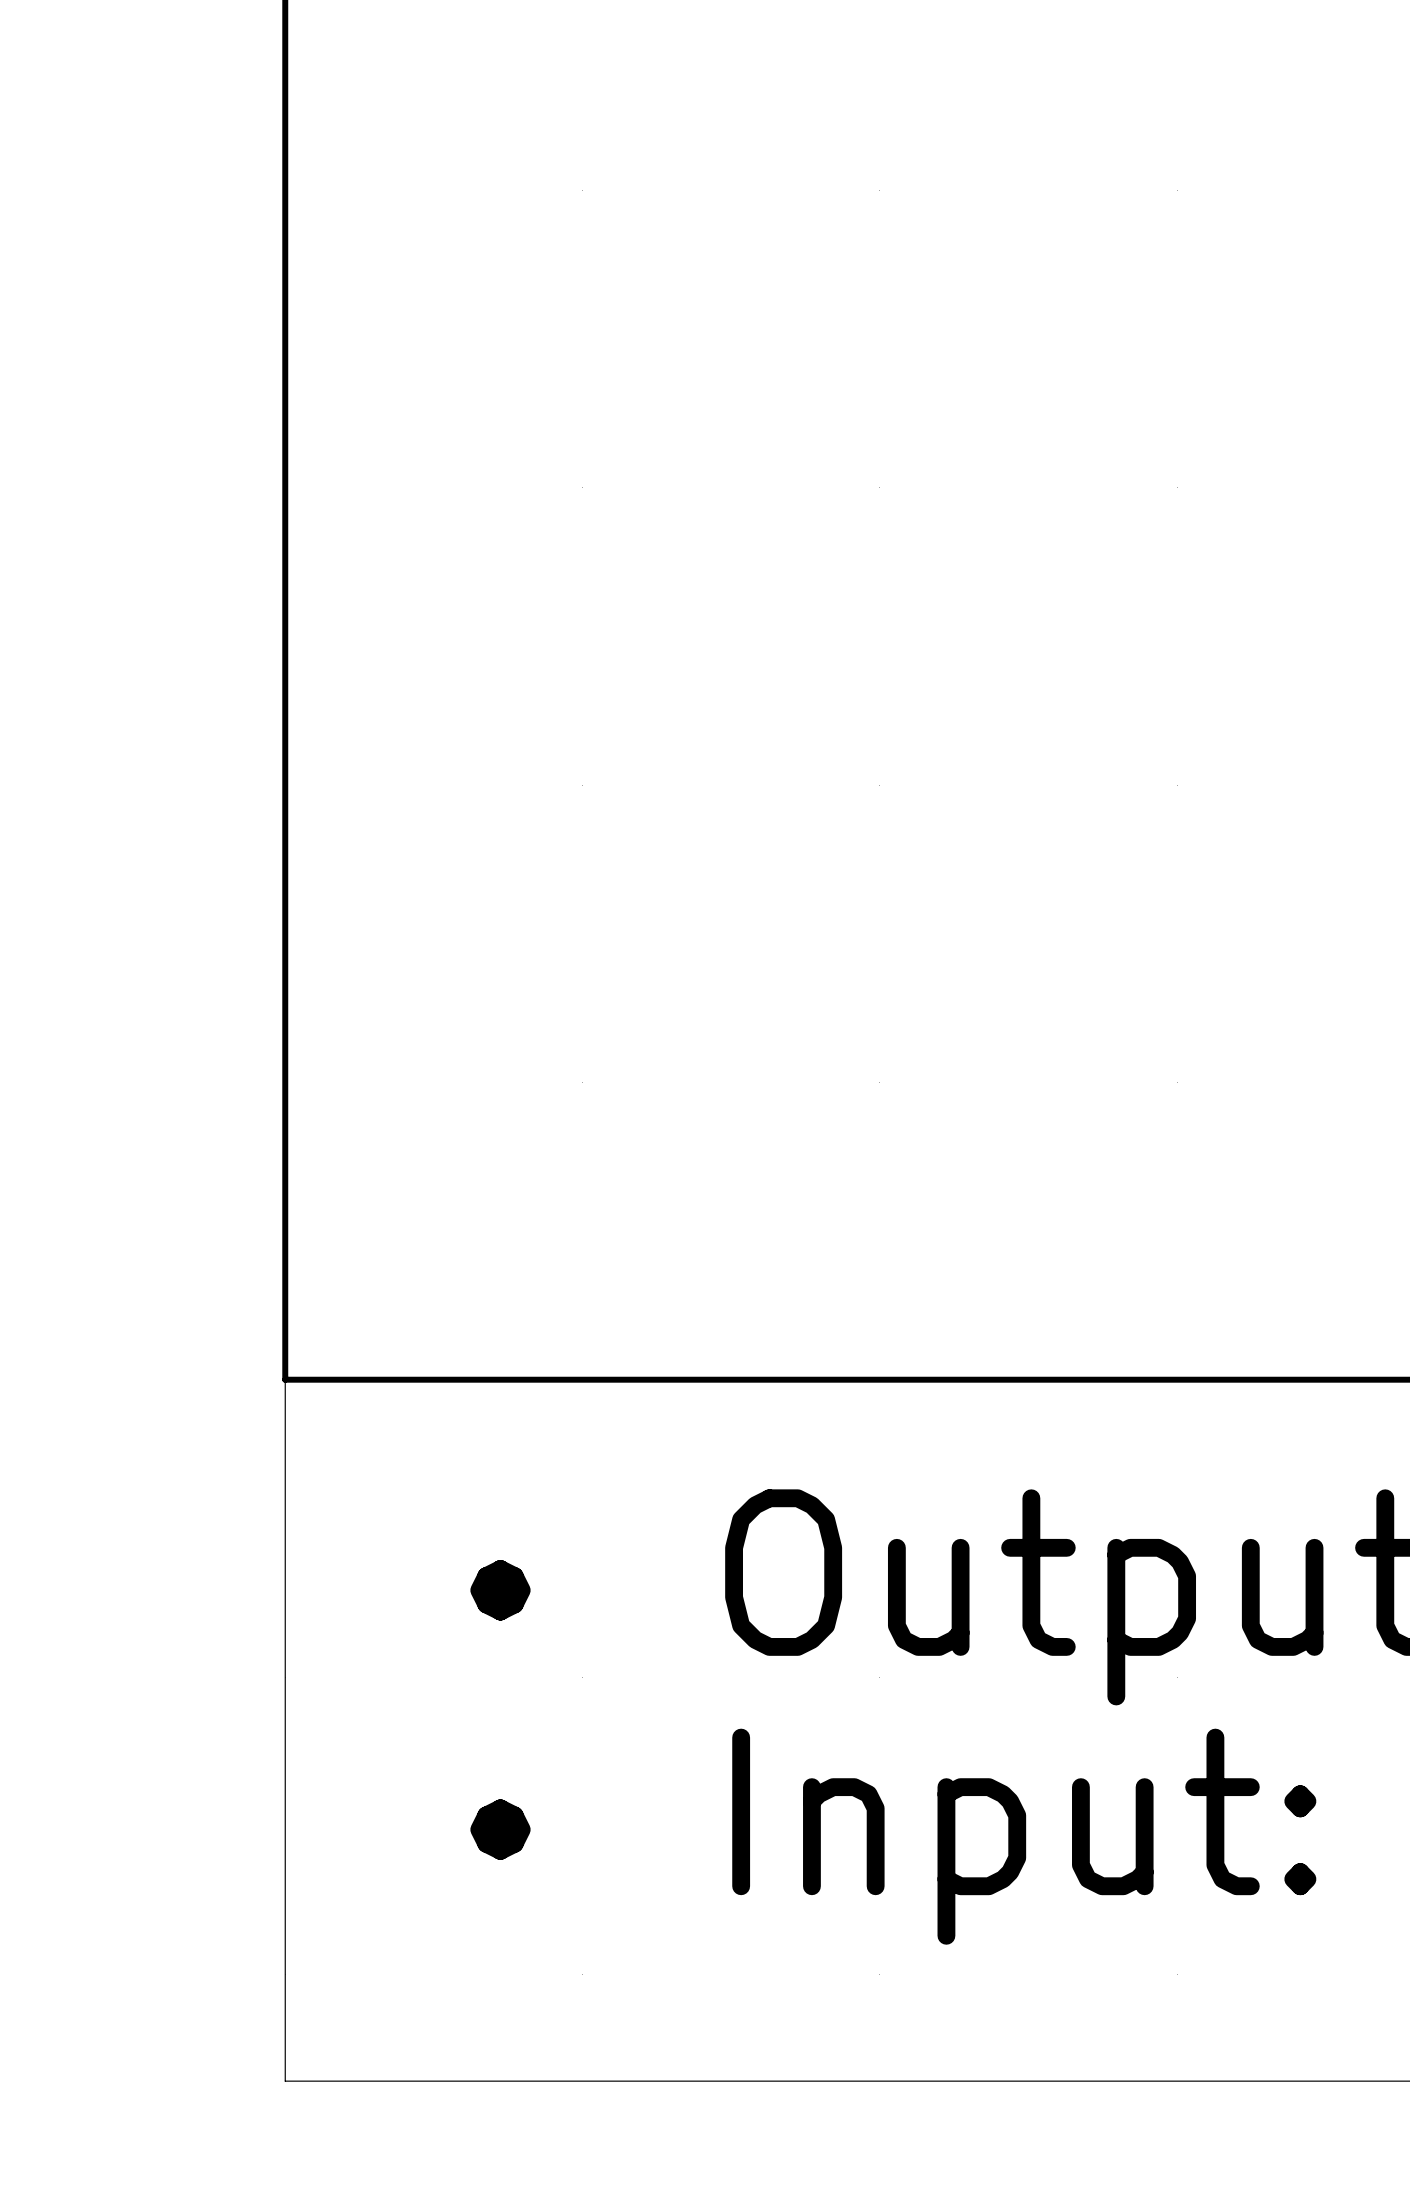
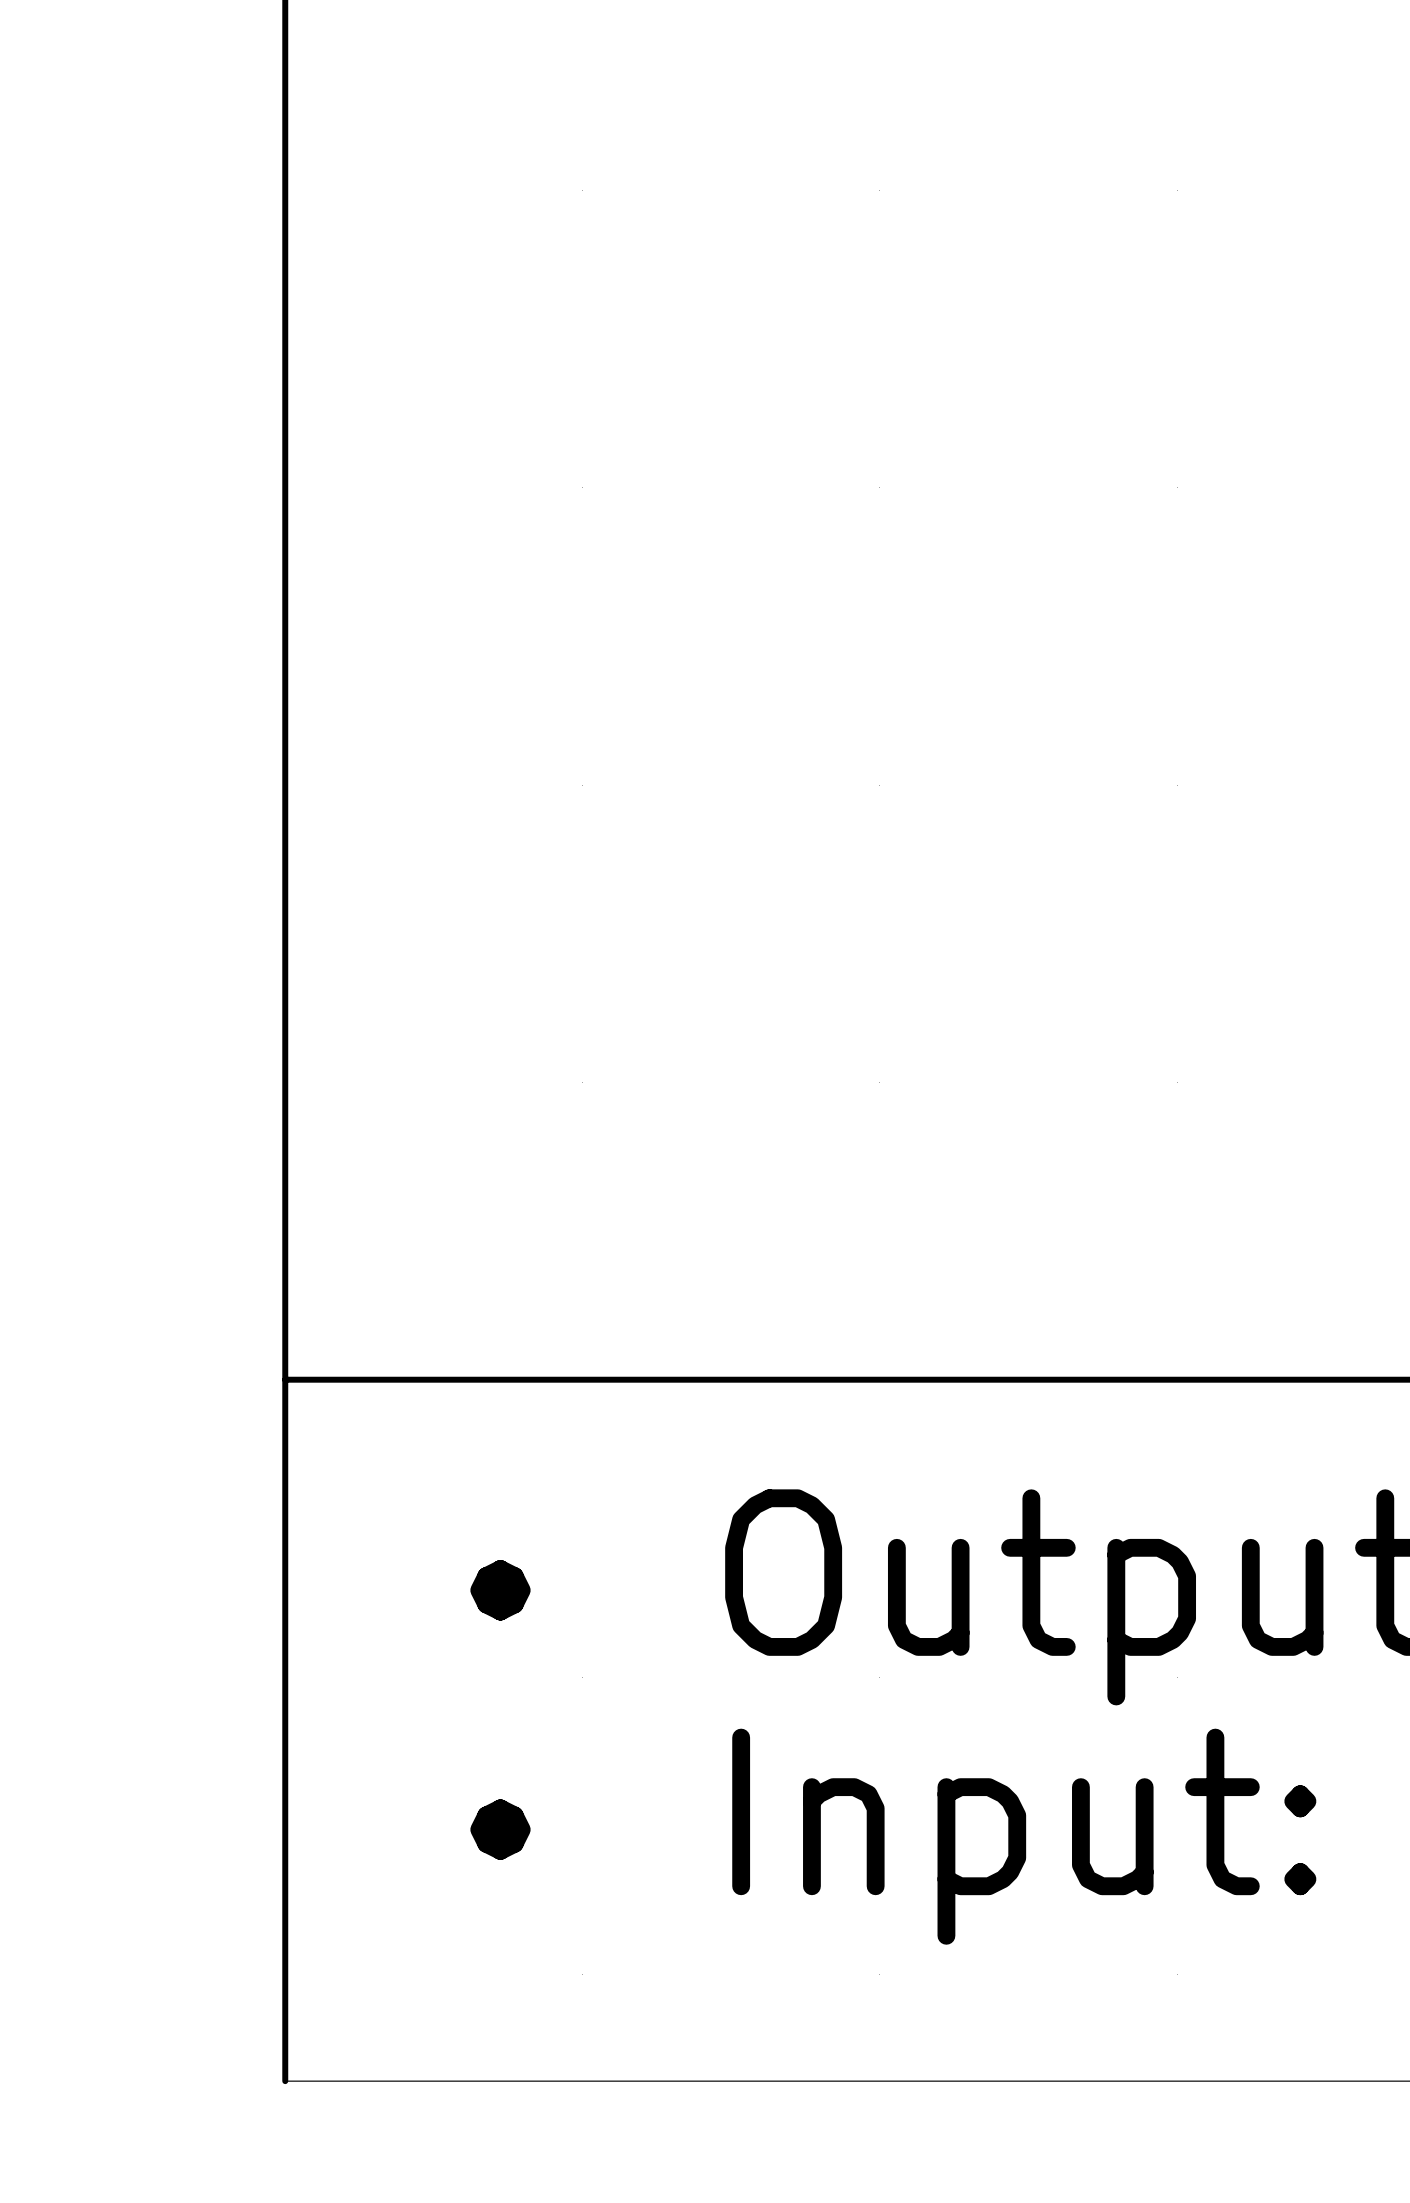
line width: thin (285, 1379) (285, 2081) -> thick (285, 1379) (285, 2081)

